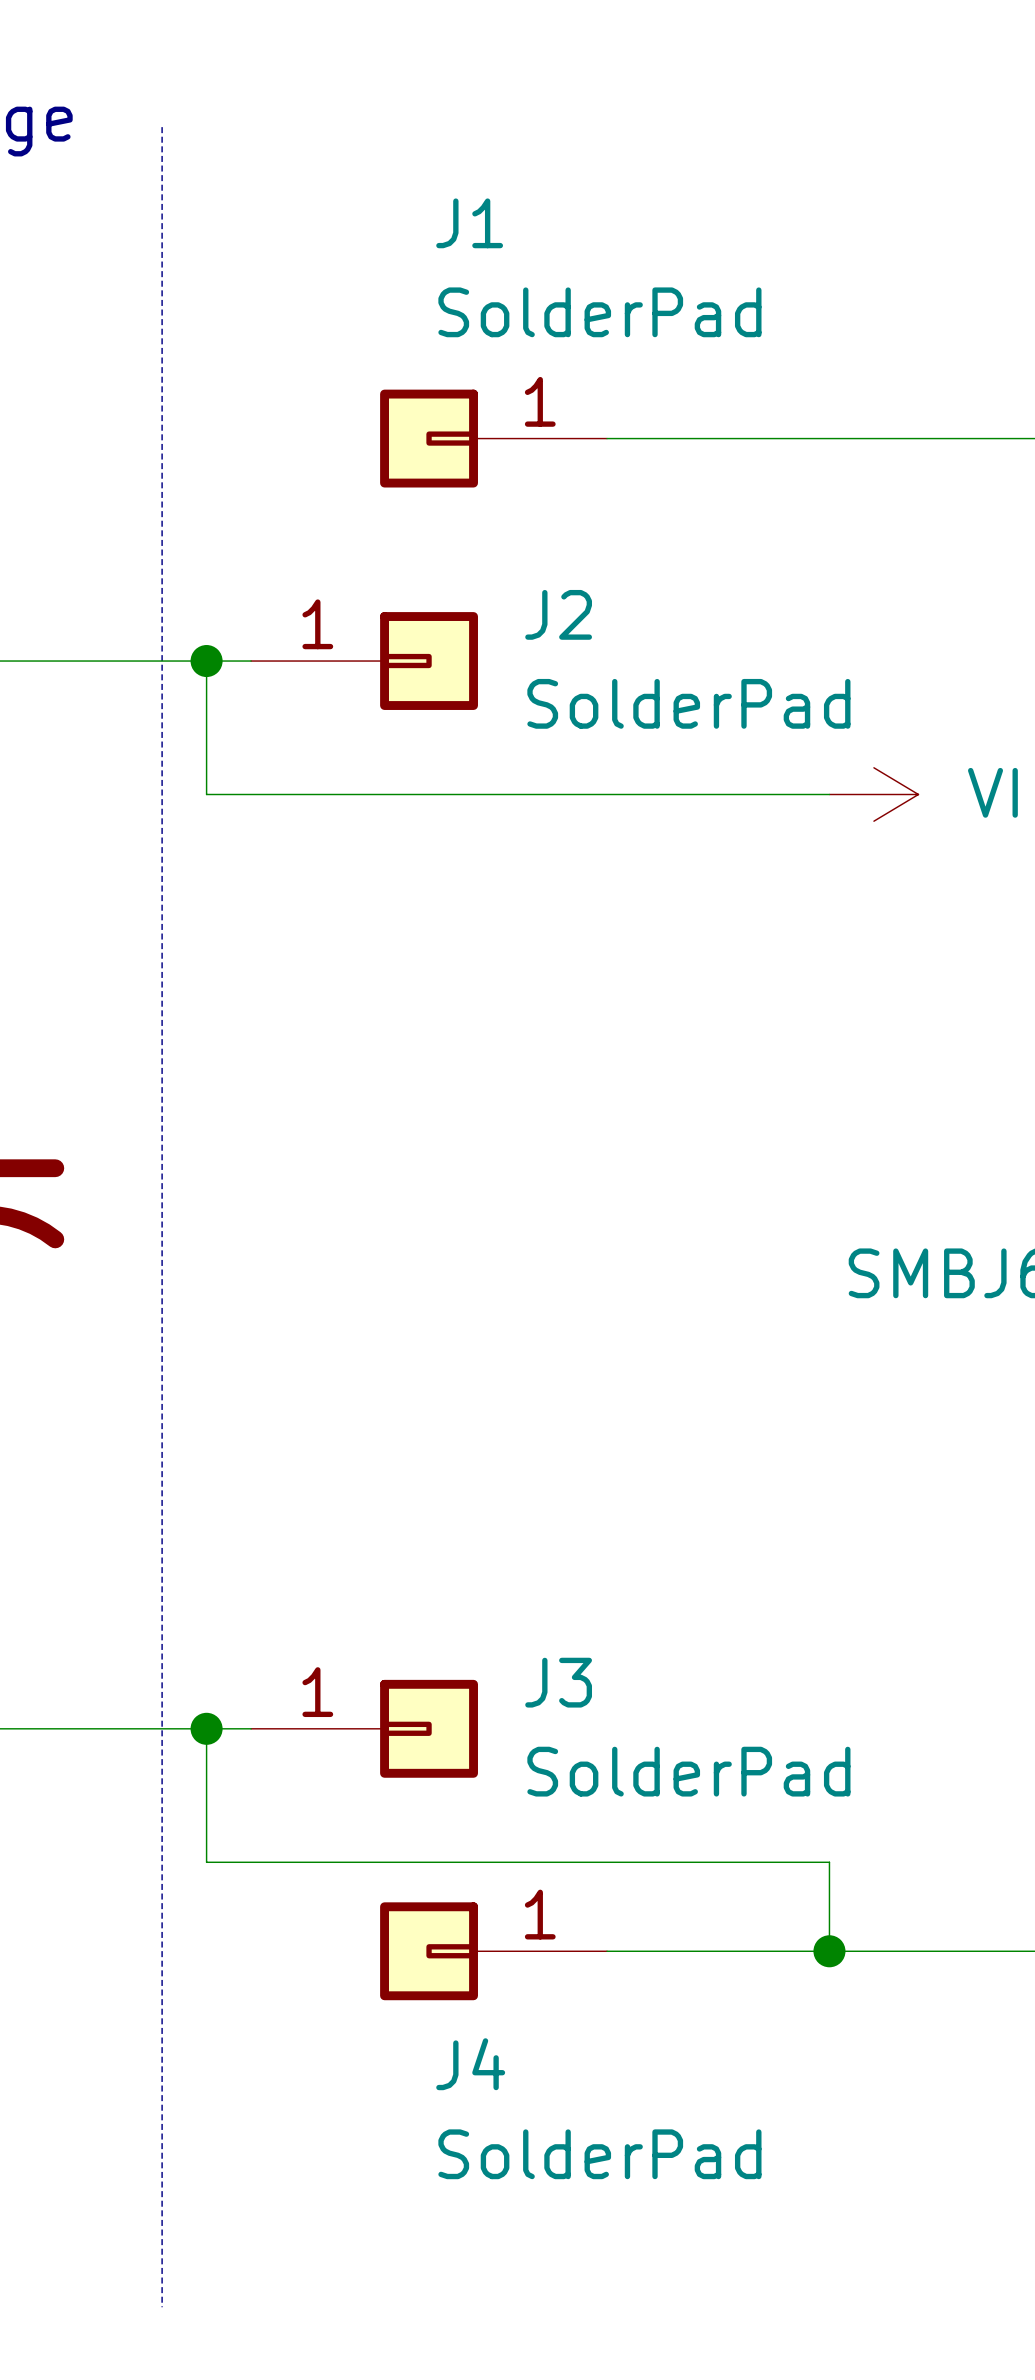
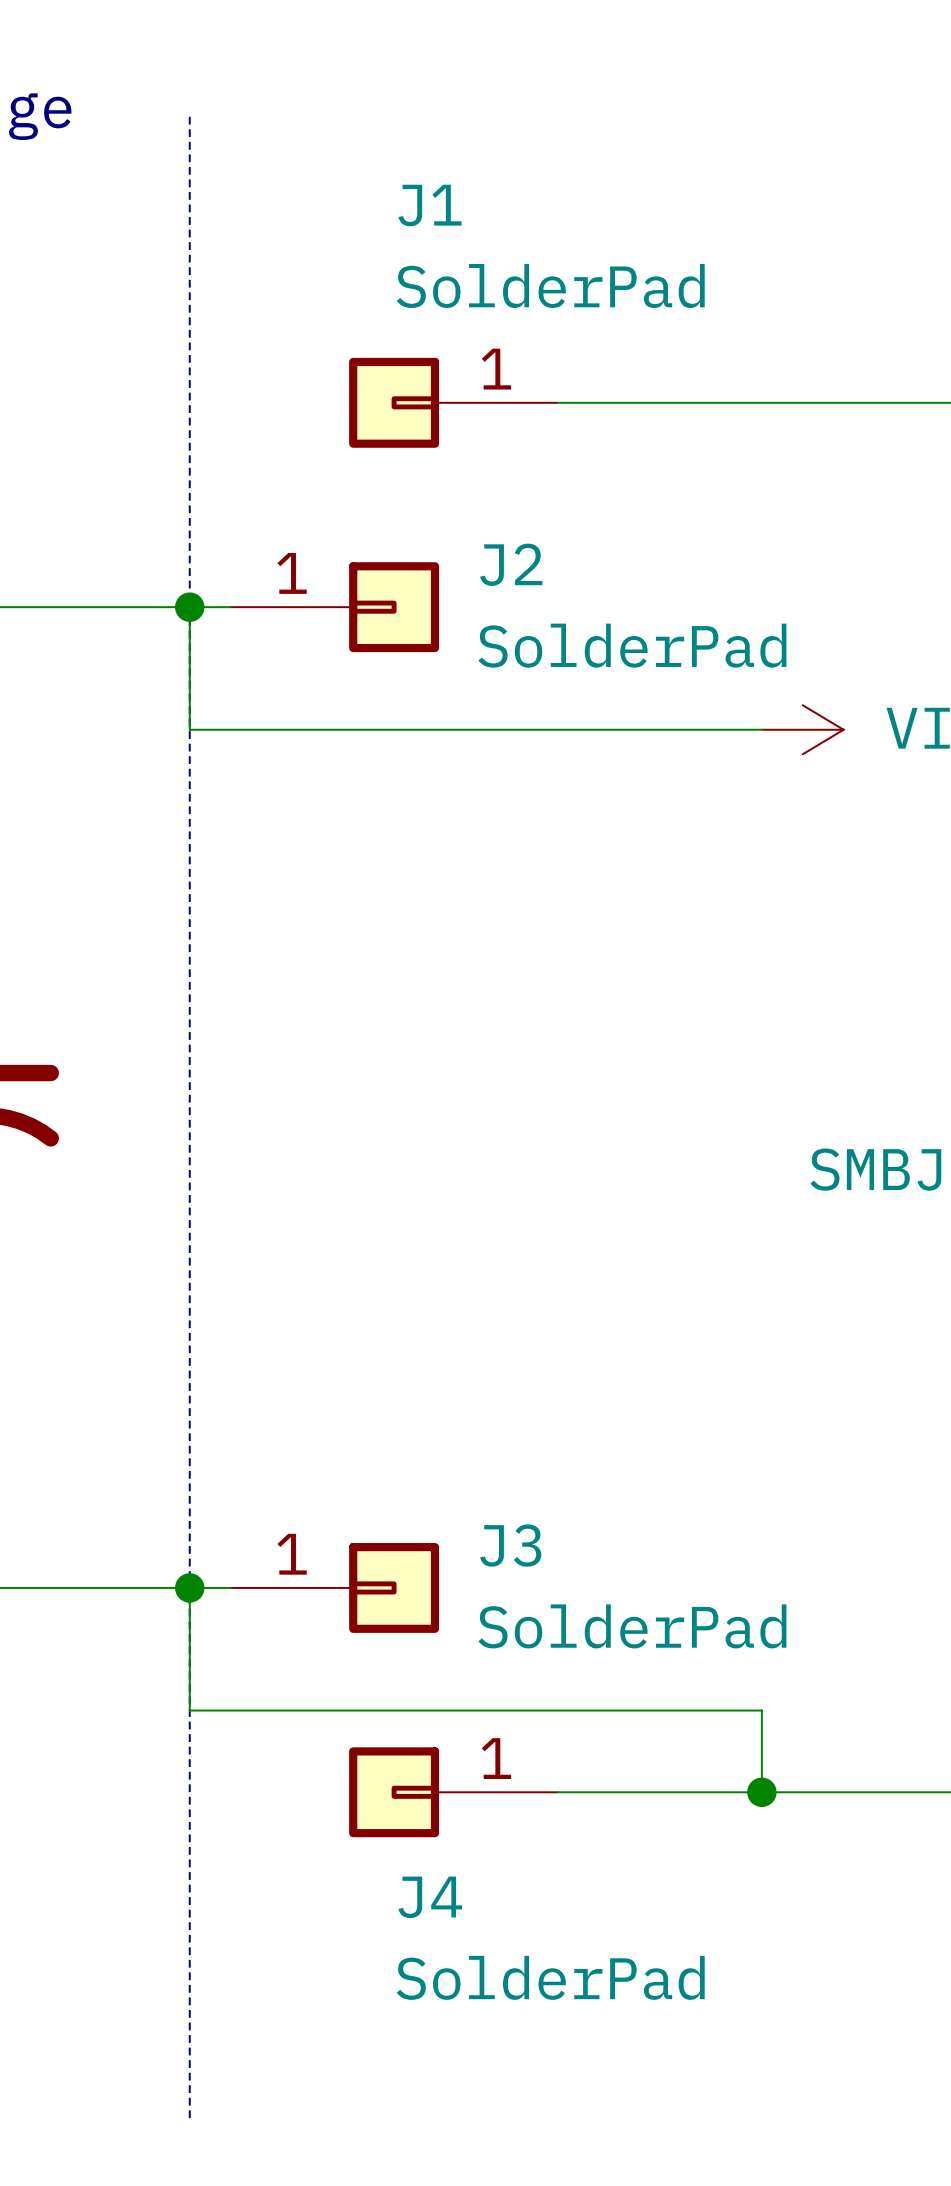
line: (162, 127) (162, 2307) -> (189, 116) (189, 2119)

